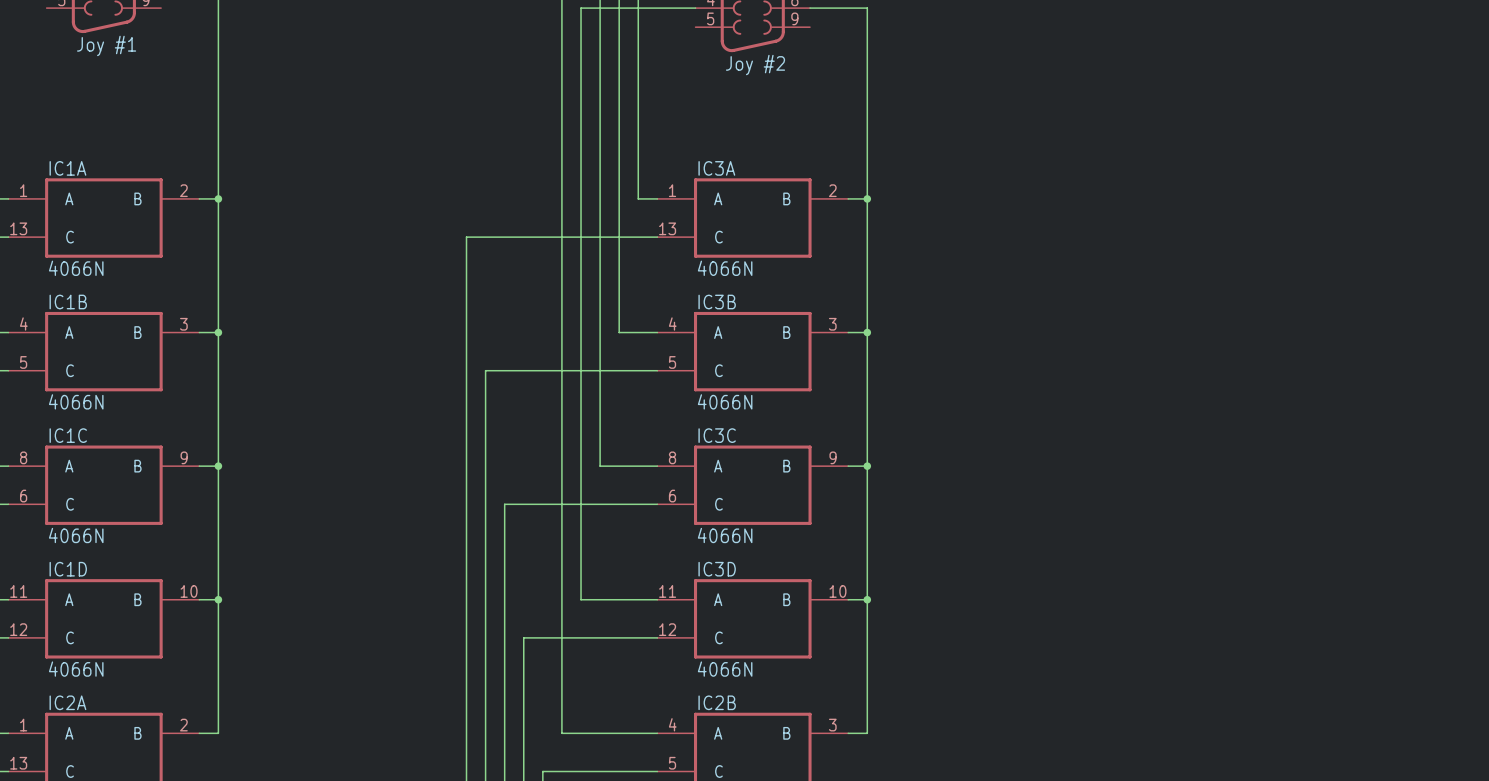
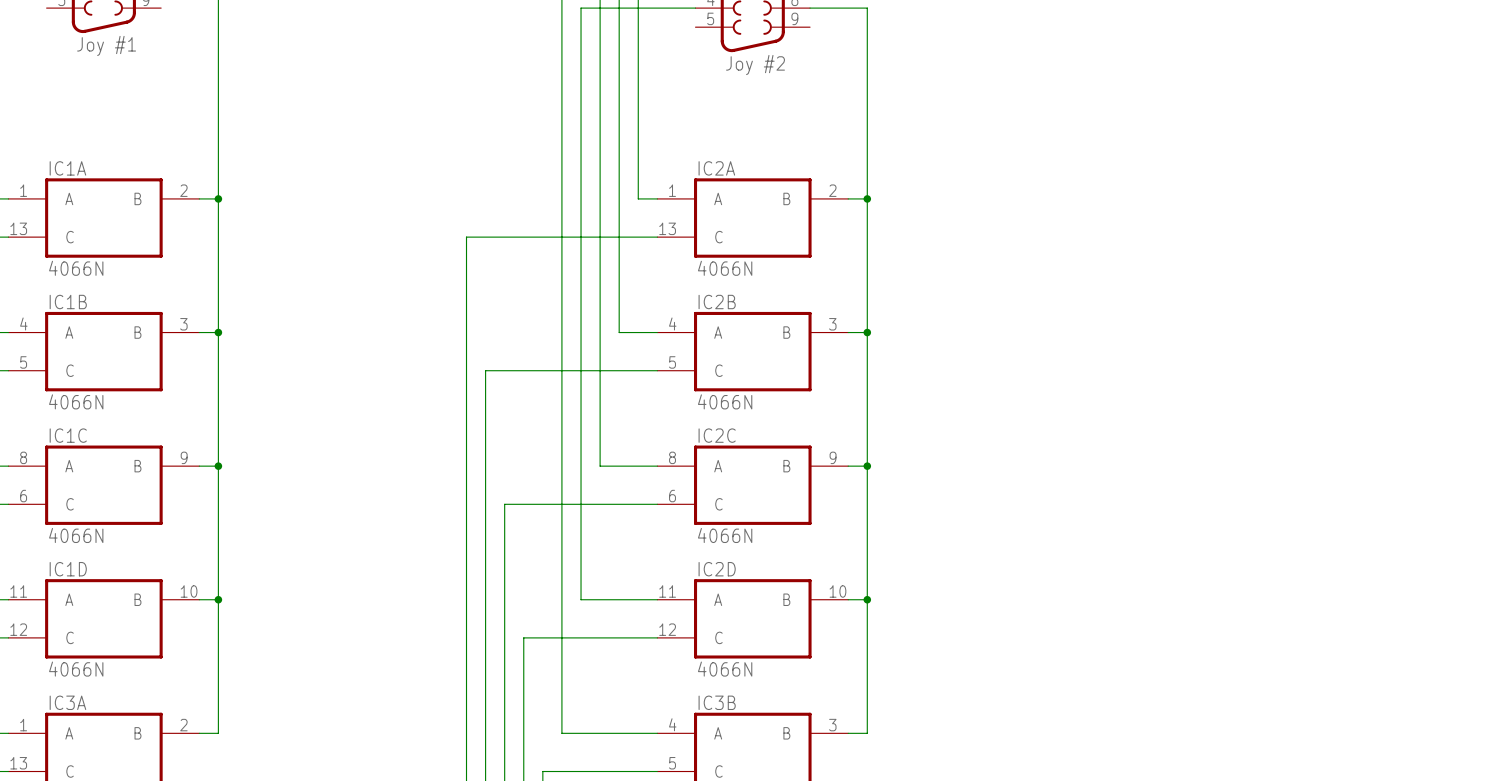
IC3A name: IC3A (716, 168) -> IC2A (716, 168)
IC3B name: IC3B (717, 302) -> IC2B (717, 302)
IC3C name: IC3C (717, 435) -> IC2C (717, 435)
IC3D name: IC3D (717, 569) -> IC2D (717, 569)
IC2A name: IC2A (67, 702) -> IC3A (67, 702)
IC2B name: IC2B (717, 702) -> IC3B (717, 702)

